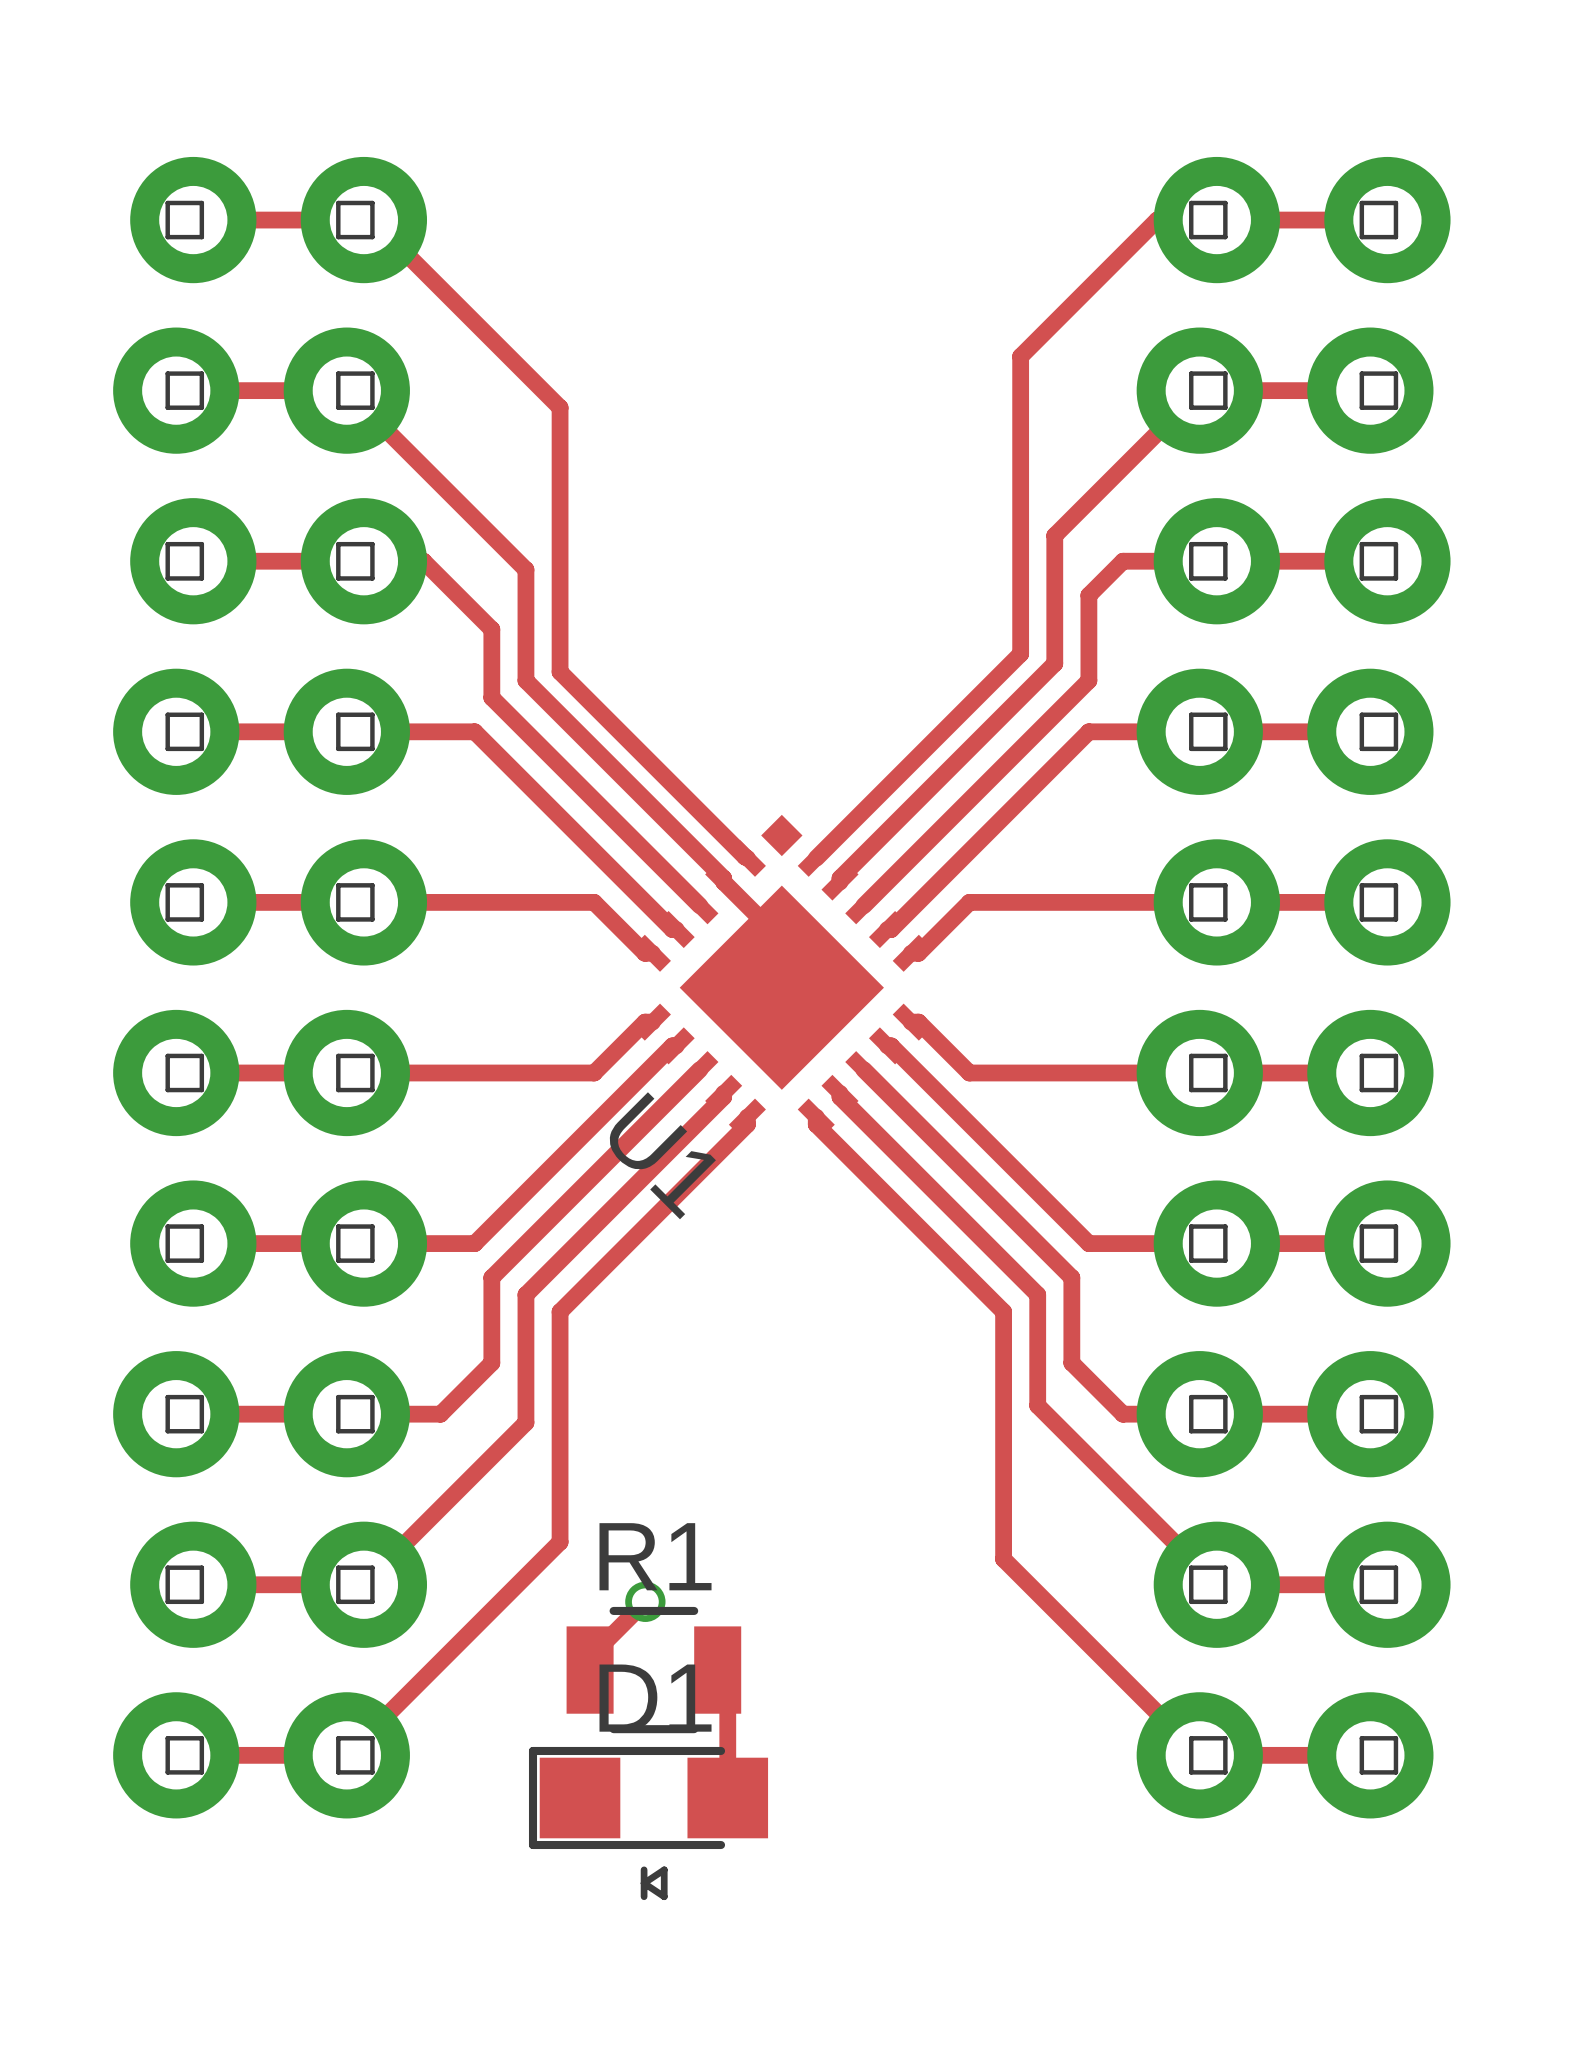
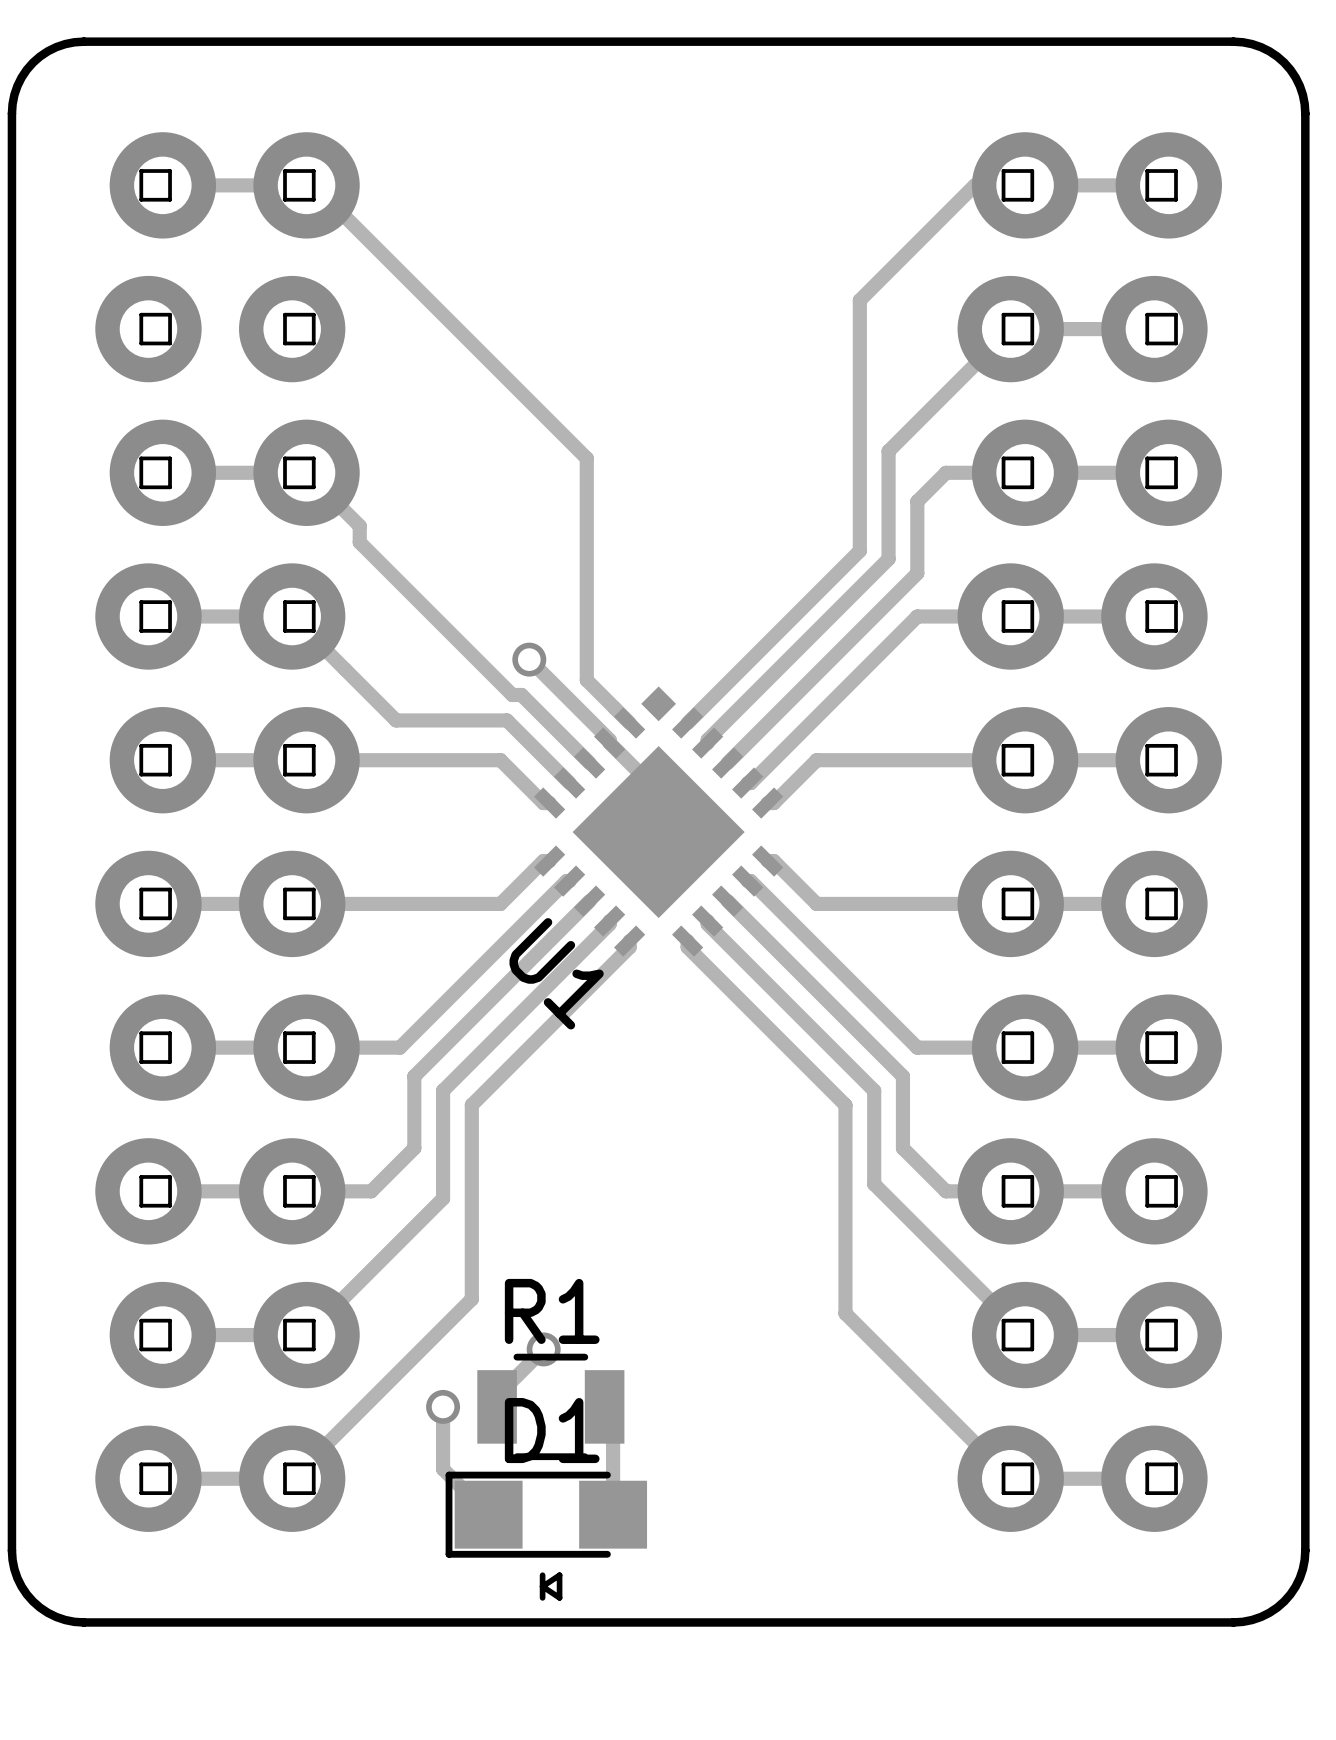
board edge: none -> (83, 41) (1233, 41) (1252, 44) (1269, 51) (1290, 69) (1302, 94) (1305, 113) (1305, 1550) (1299, 1578) (1290, 1594) (1277, 1607) (1260, 1617) (1233, 1622) (83, 1622) (56, 1617) (40, 1607) (26, 1594) (17, 1578) (11, 1550) (11, 113) (17, 86) (32, 62) (56, 47) (83, 41)
track: (176, 390) (346, 390) (525, 569) (525, 680) (628, 782) -> none
track: (560, 407) (560, 672) (747, 858) -> (471, 343) (586, 458) (586, 680) (629, 723)
track: (363, 561) (423, 561) (491, 629) (491, 697) (619, 824) -> (306, 472) (359, 525) (359, 542) (512, 694) (521, 694)
track: (346, 731) (474, 731) (672, 929) (676, 929) -> (292, 616) (396, 720) (507, 720) (569, 783)
via: none -> (529, 659)
track: none -> (443, 1406) (443, 1469) (488, 1514)
via: none -> (443, 1406)

